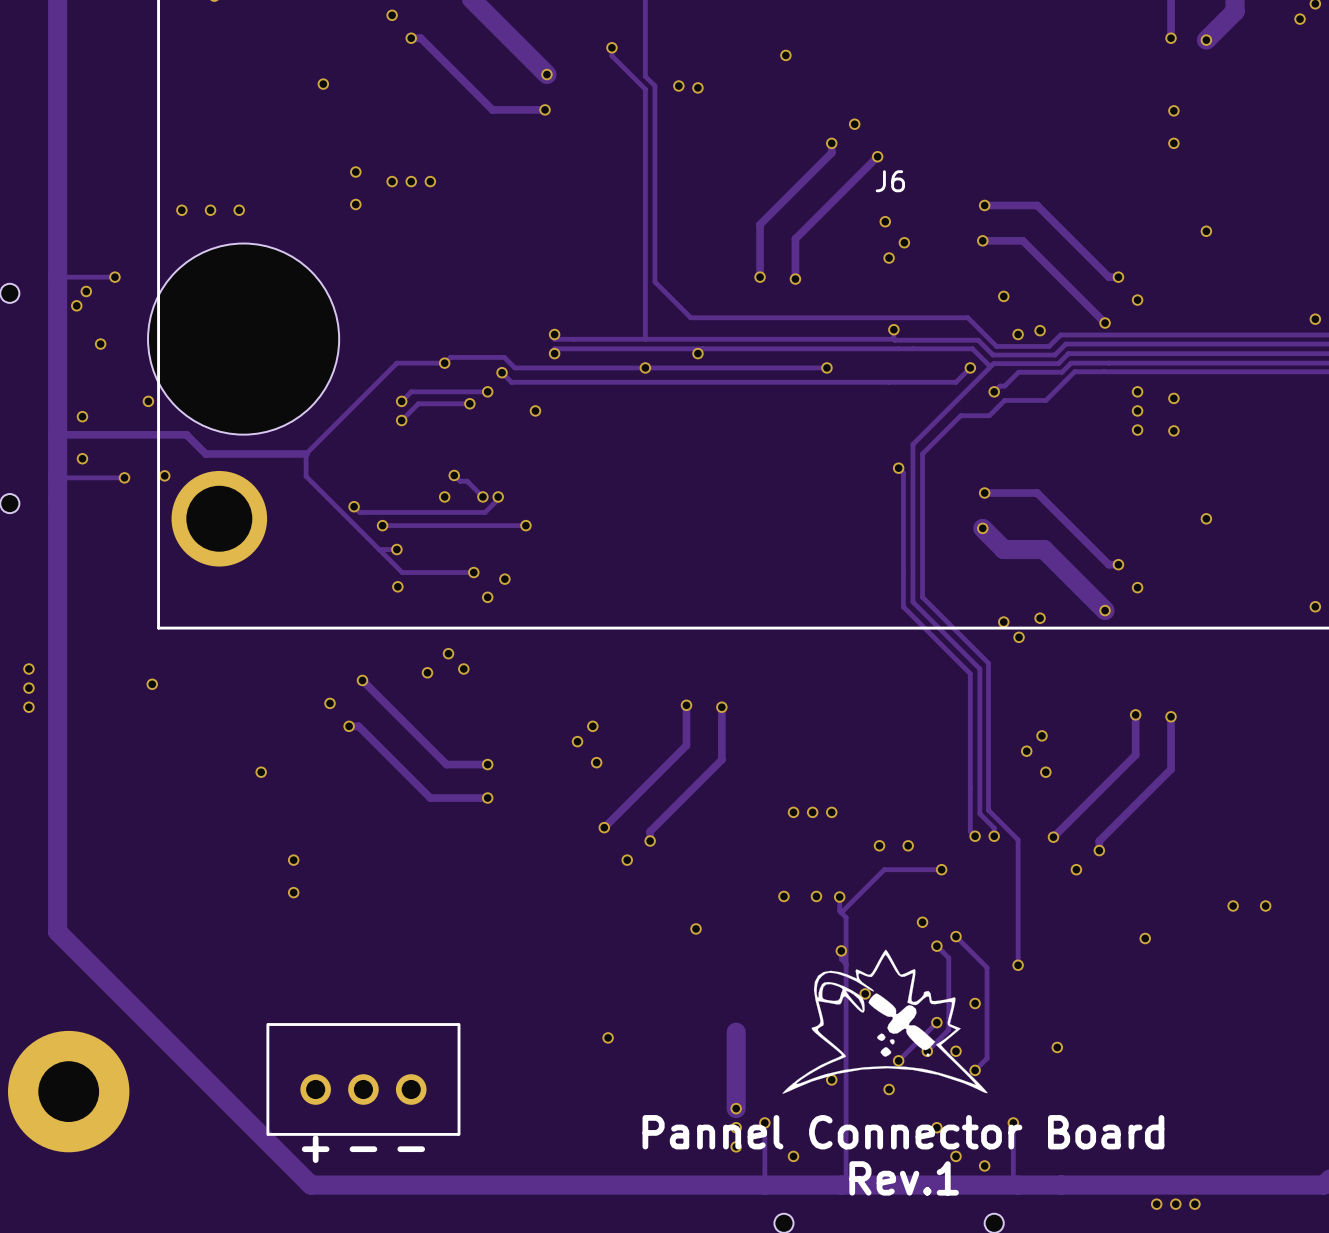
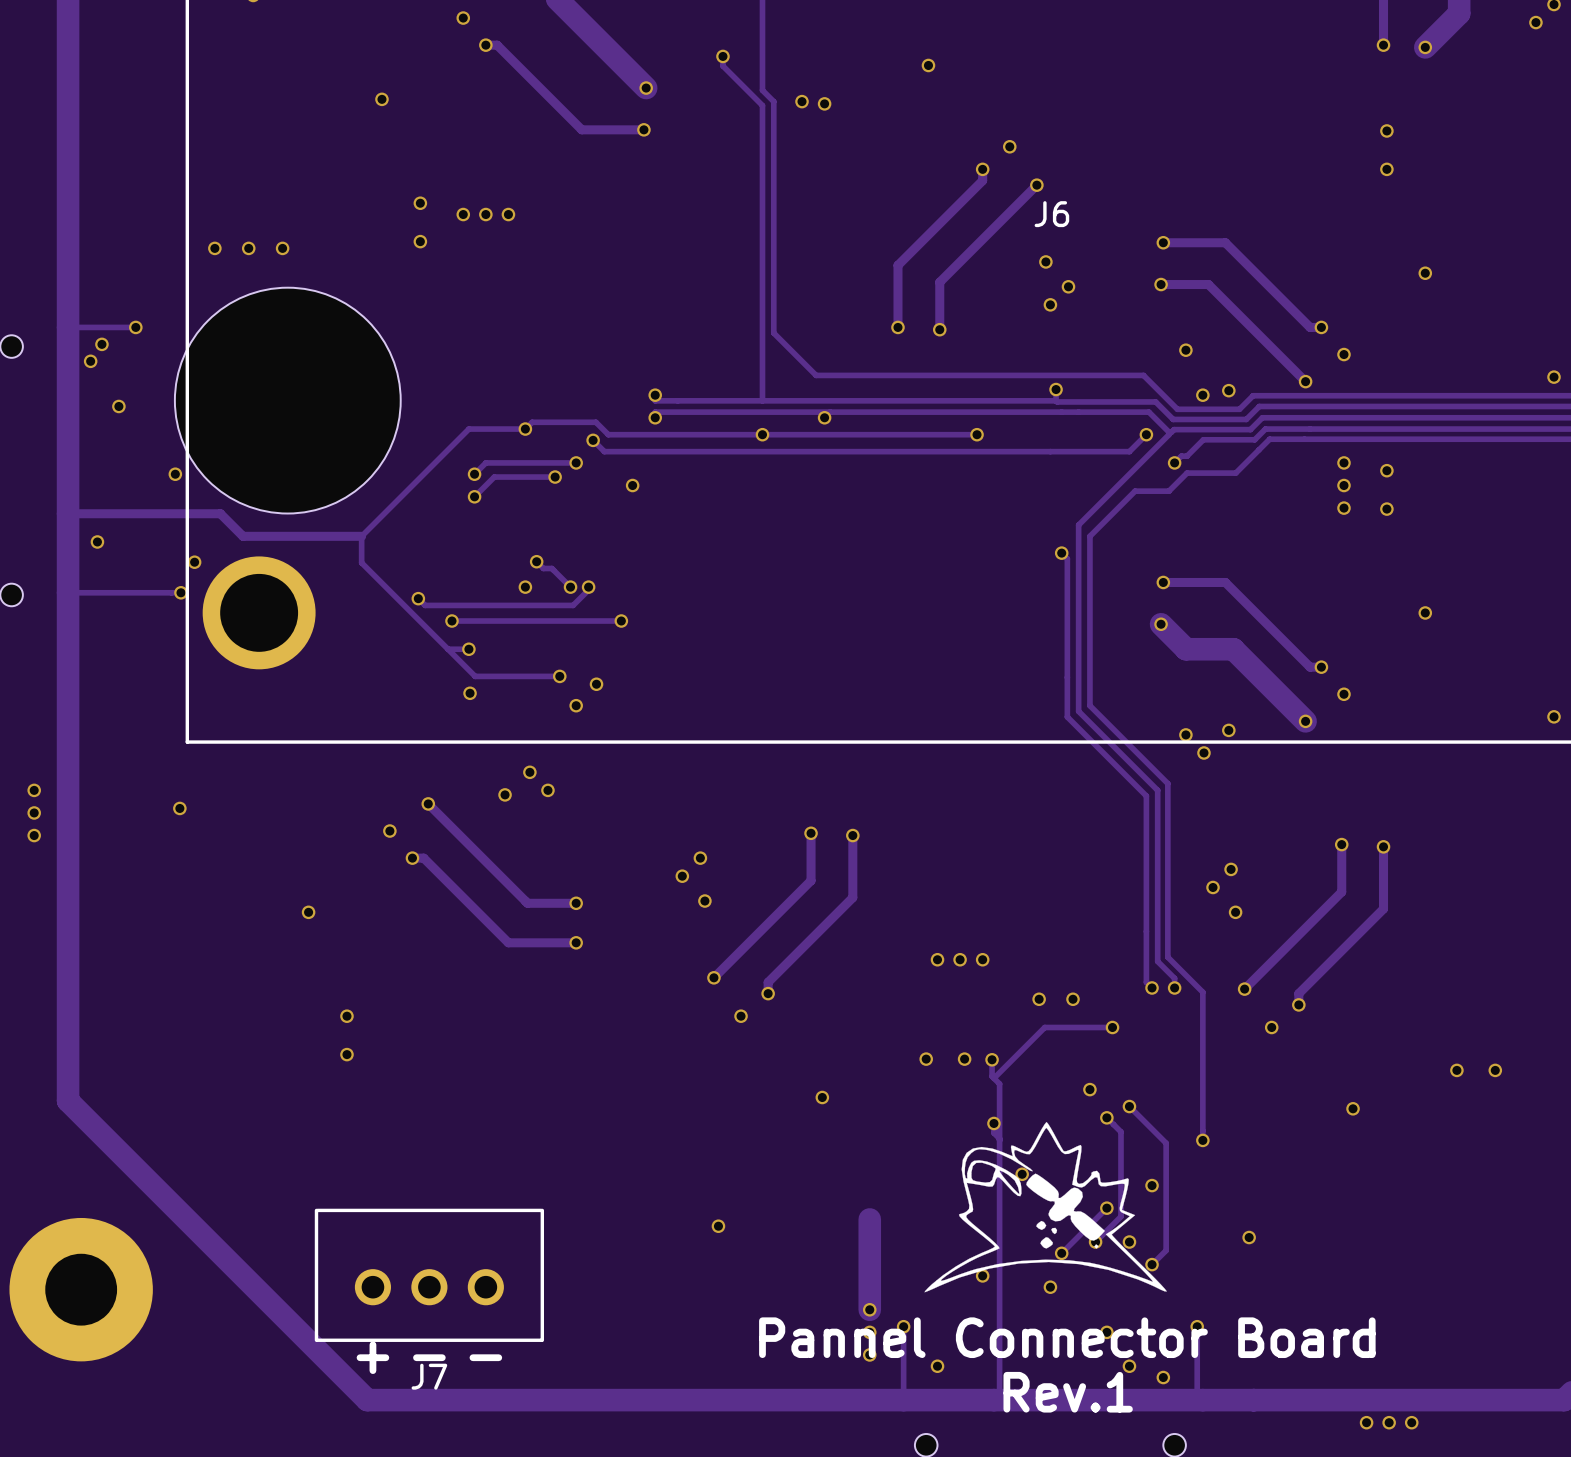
via: (82, 416) -> none
track: (57, 477) (124, 477) -> none
via position: (124, 477) -> (180, 592)
track: none -> (68, 592) (180, 592)
J7 name: none -> J7 (429, 1376)

